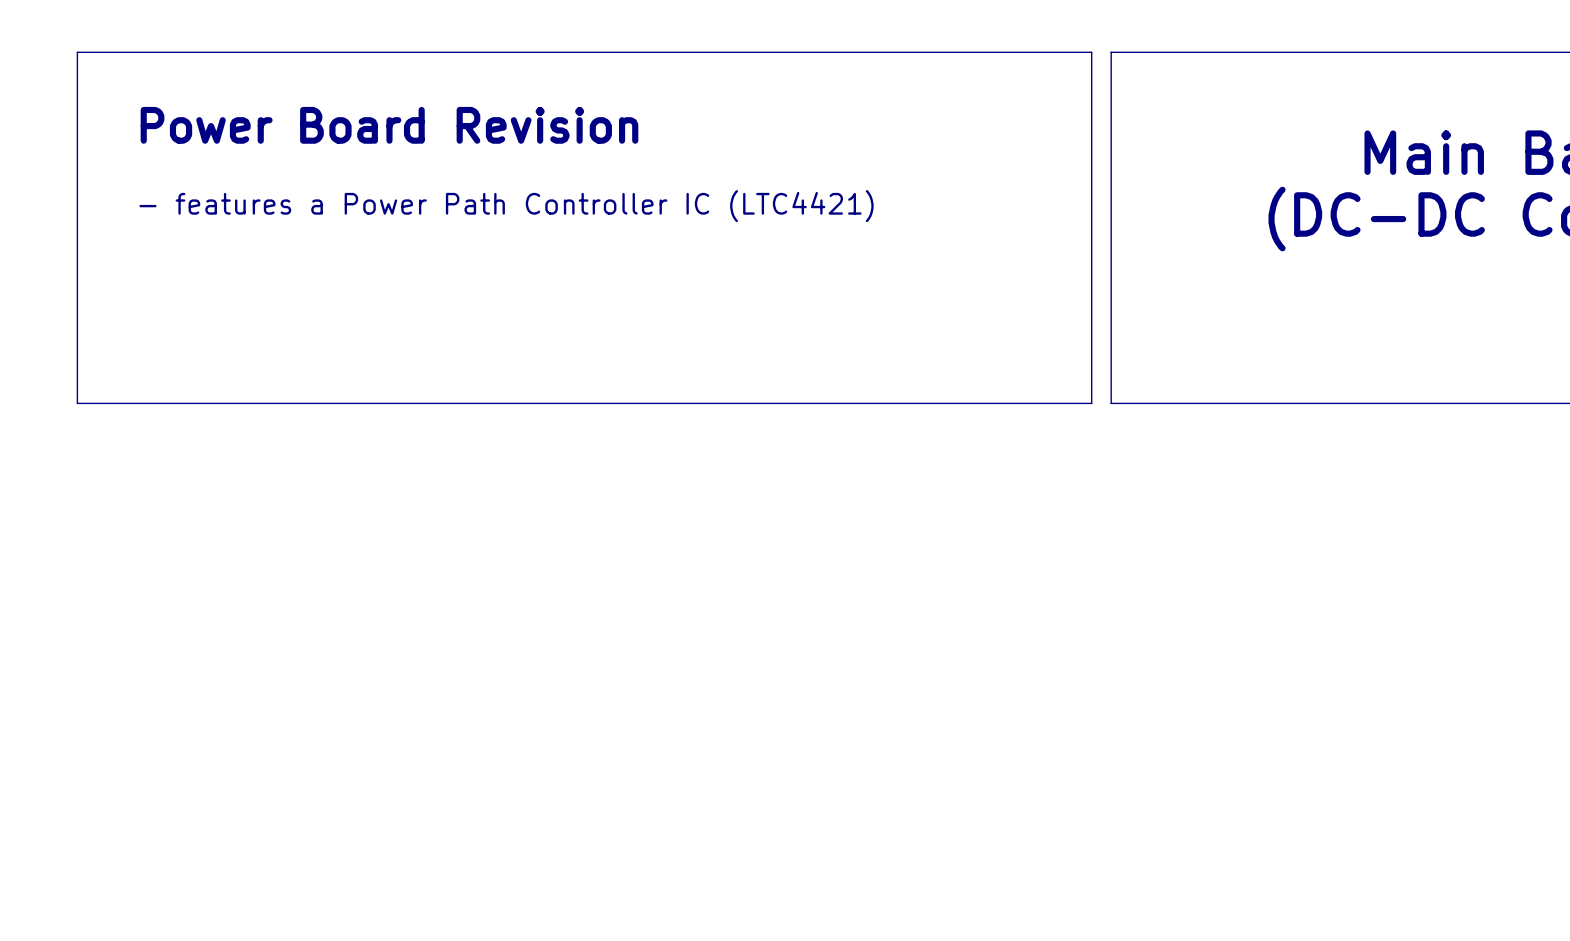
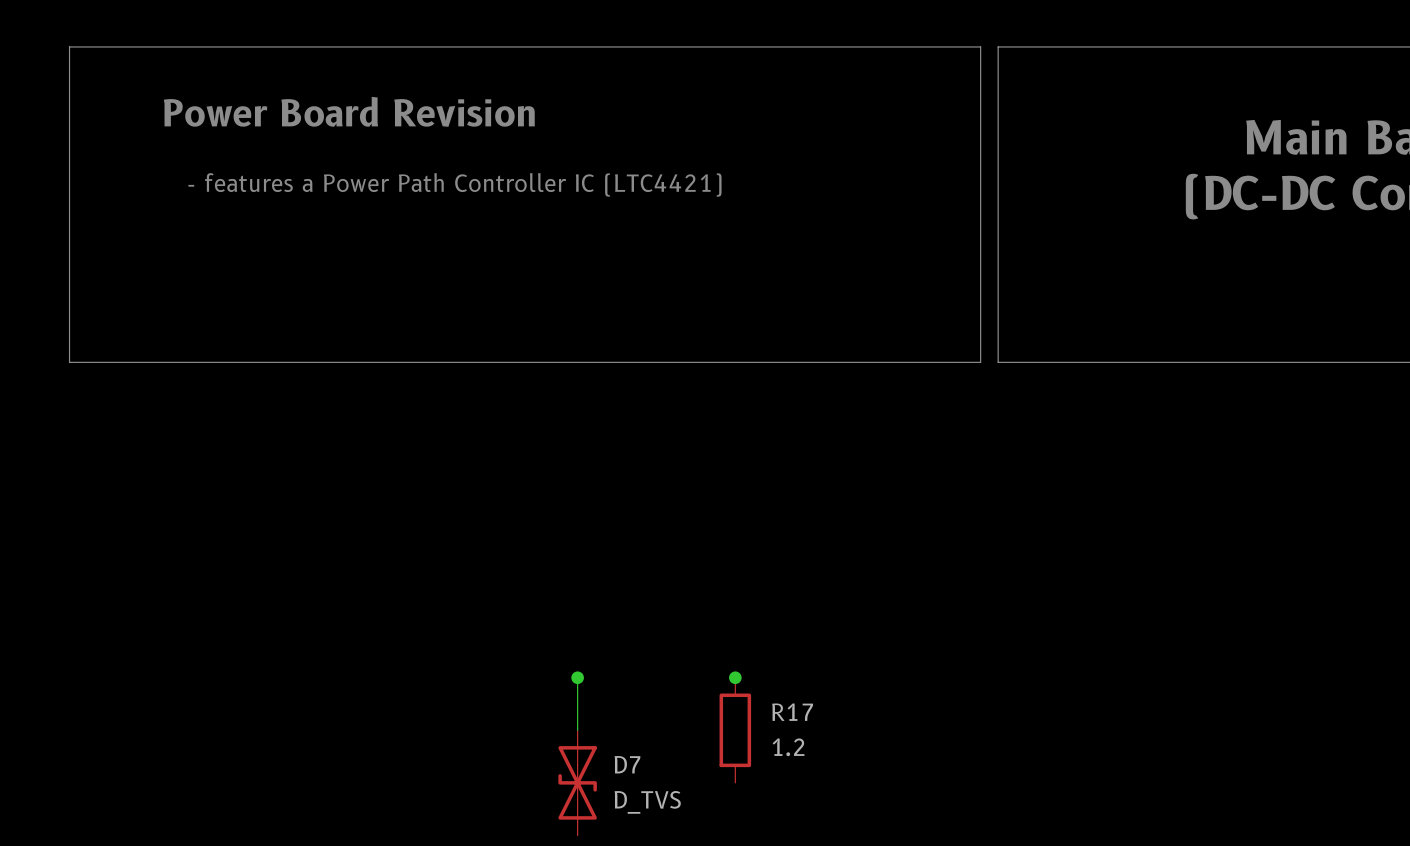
wire: none -> (577, 677) (577, 730)
junction: none -> (577, 677)
junction: none -> (735, 677)
R17: none -> 1.2 (735, 730)
D7: none -> D_TVS (577, 782)

